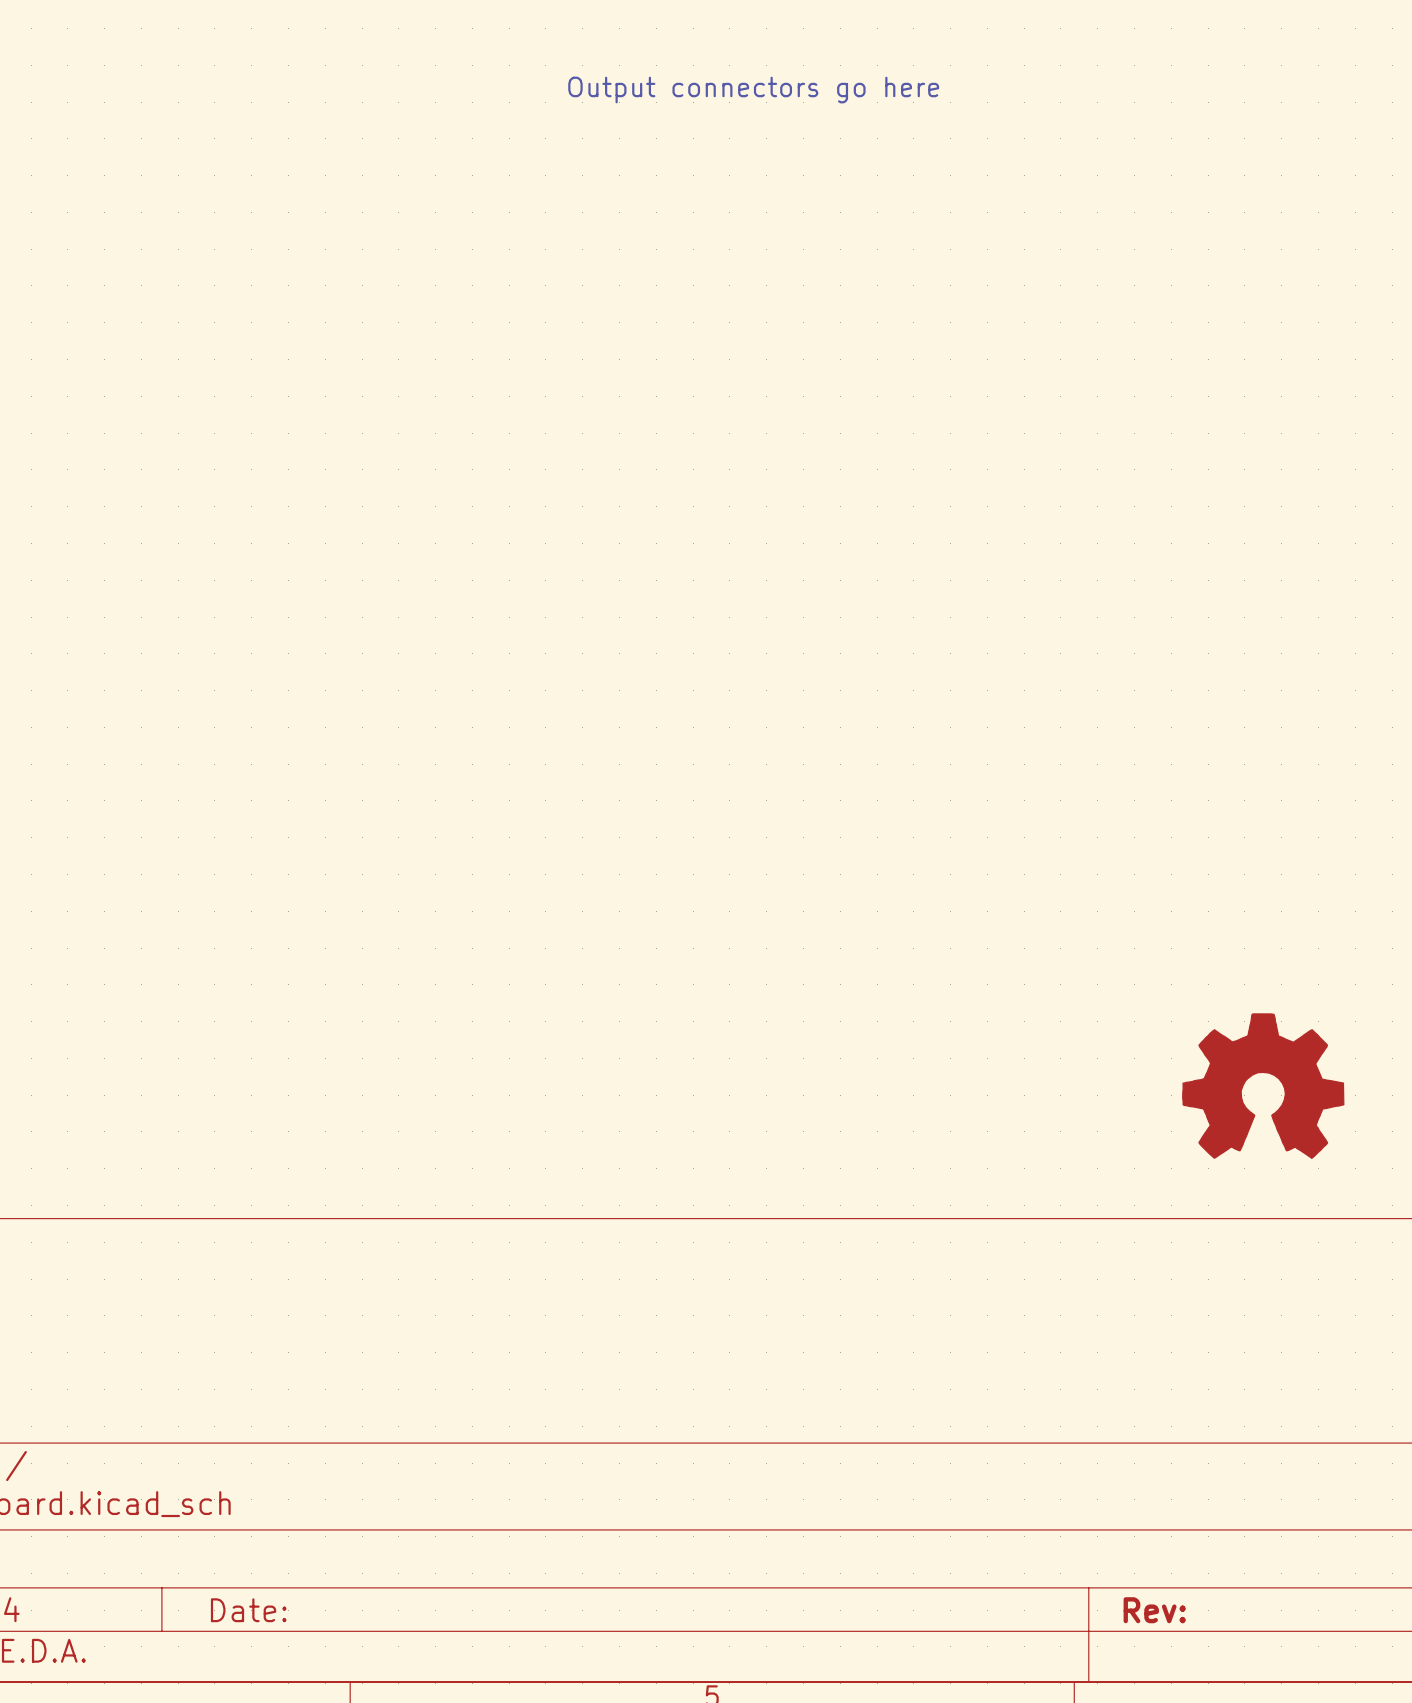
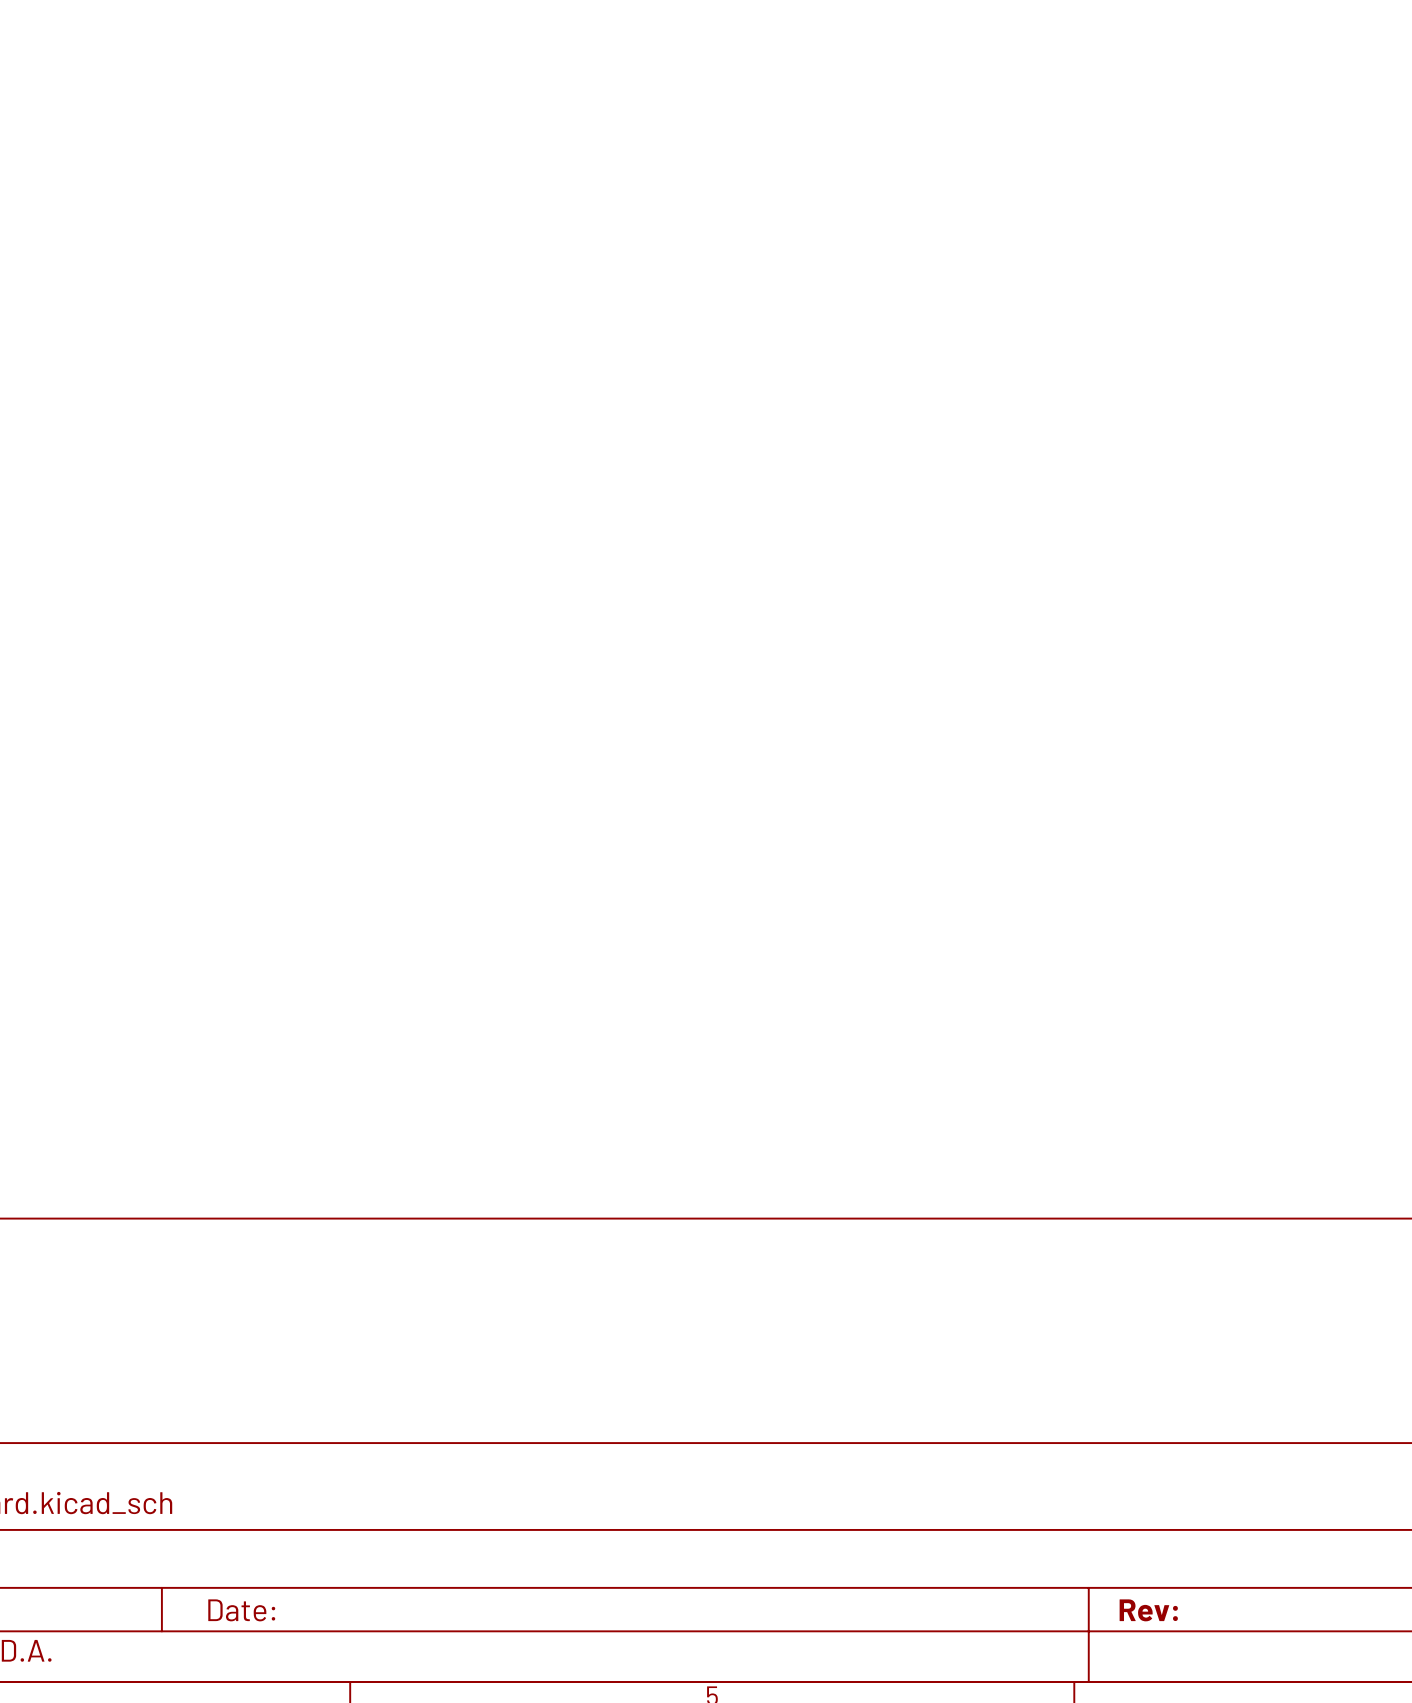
text: Output connectors go here (753, 90) -> none
part: (1263, 1086) -> none

